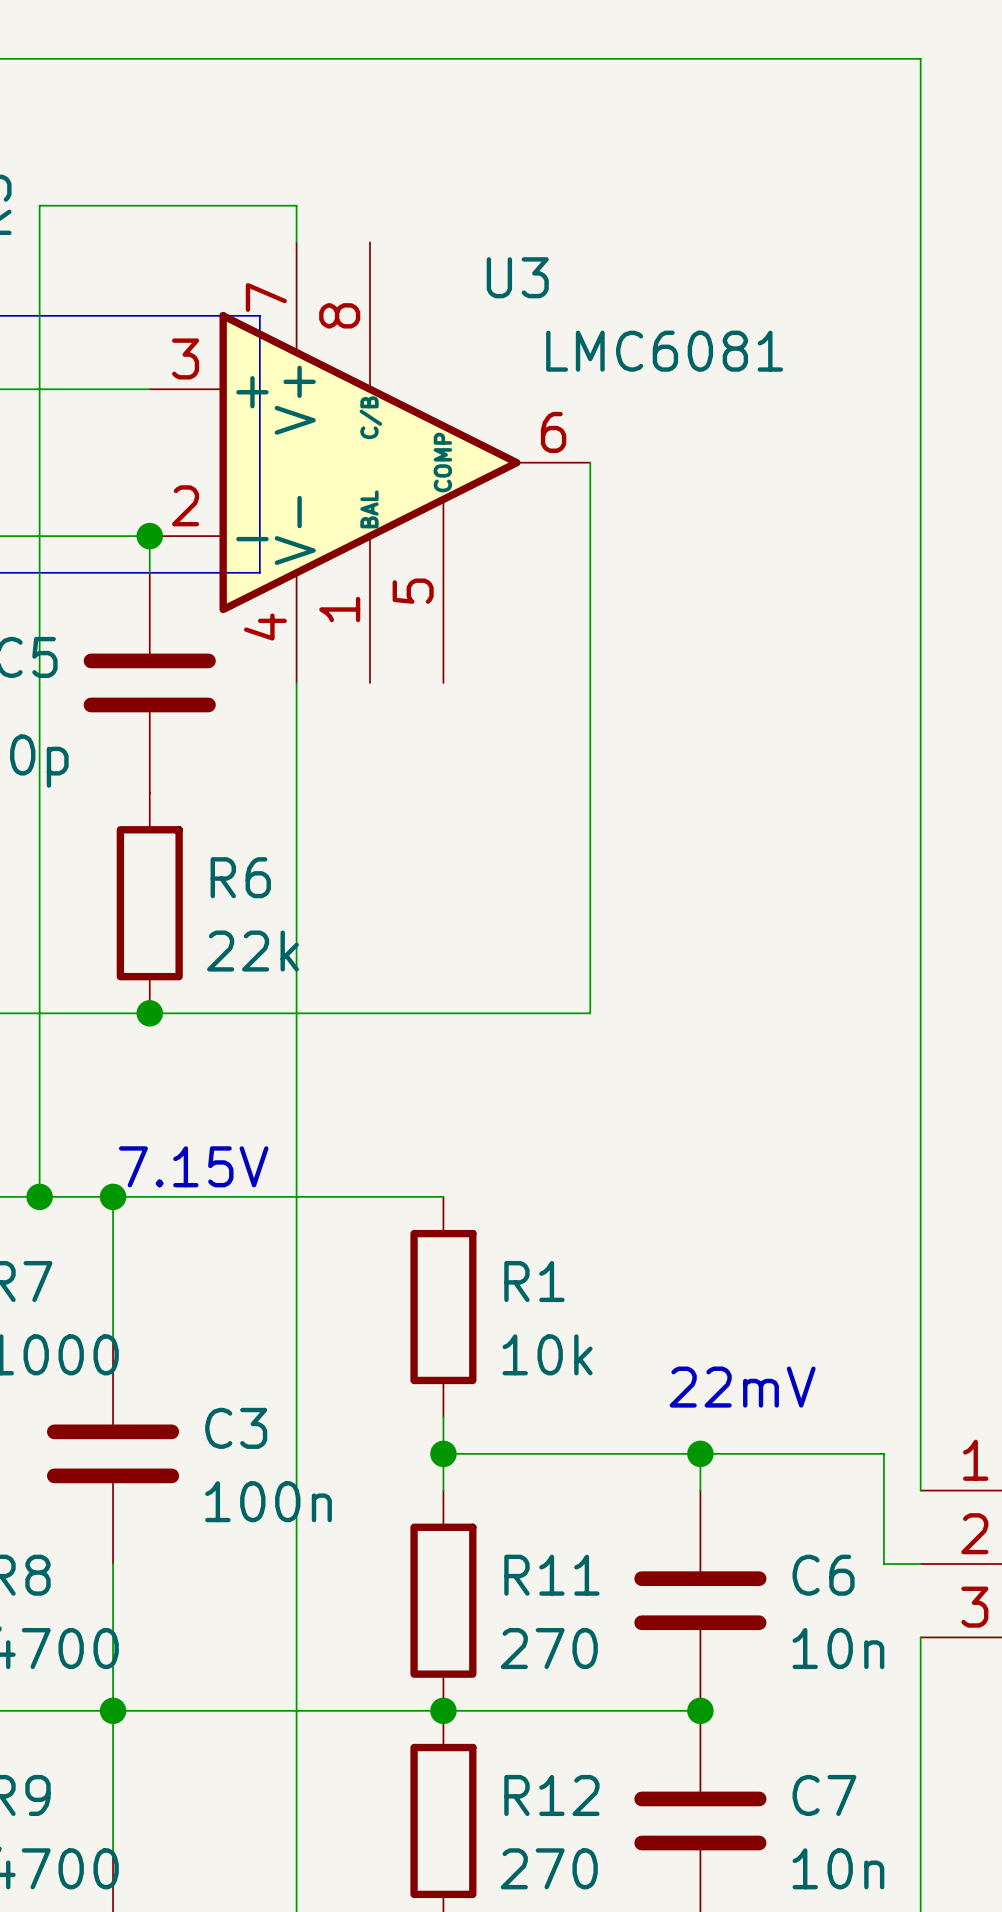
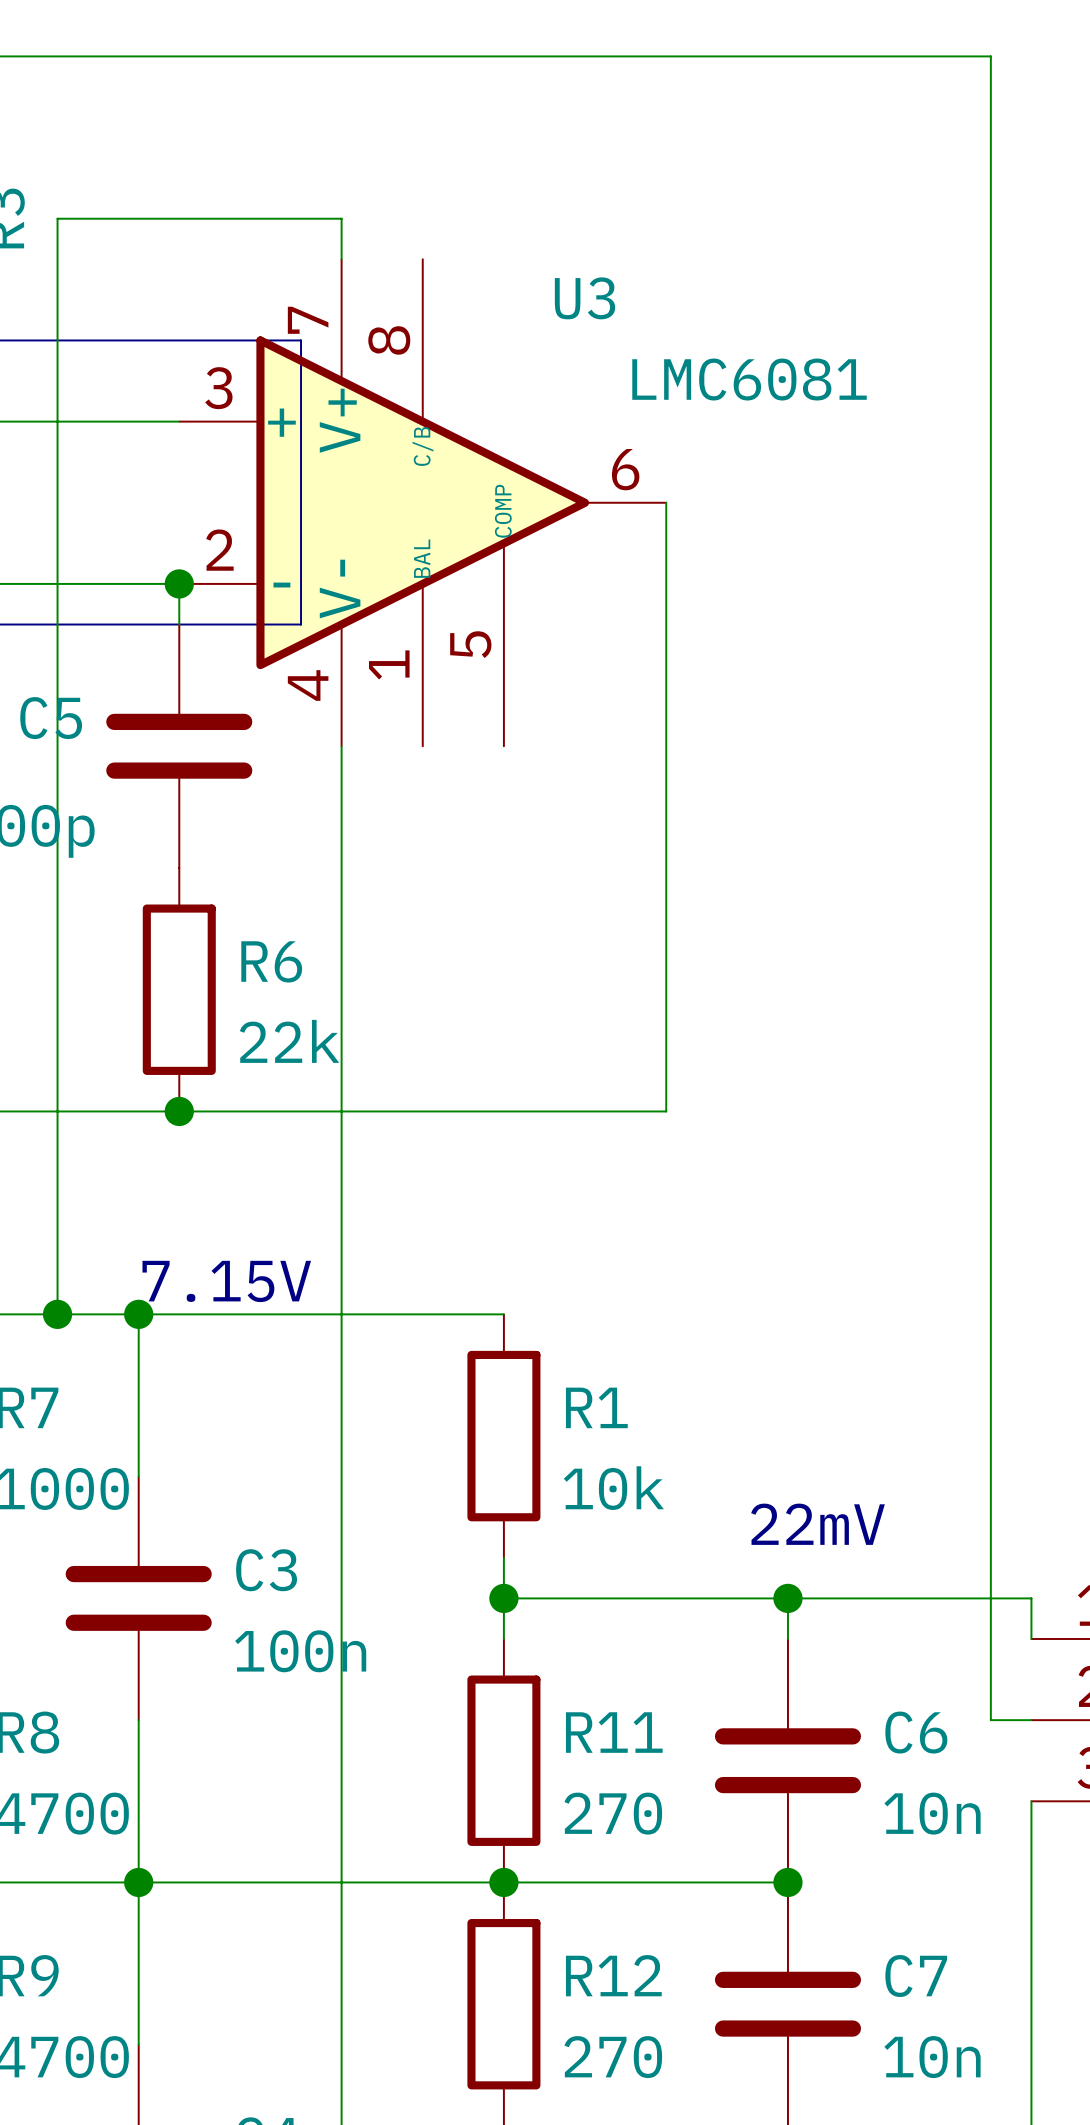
wire: (883, 58) (920, 58) (920, 1453) -> (990, 56) (990, 1598) (1031, 1598)

